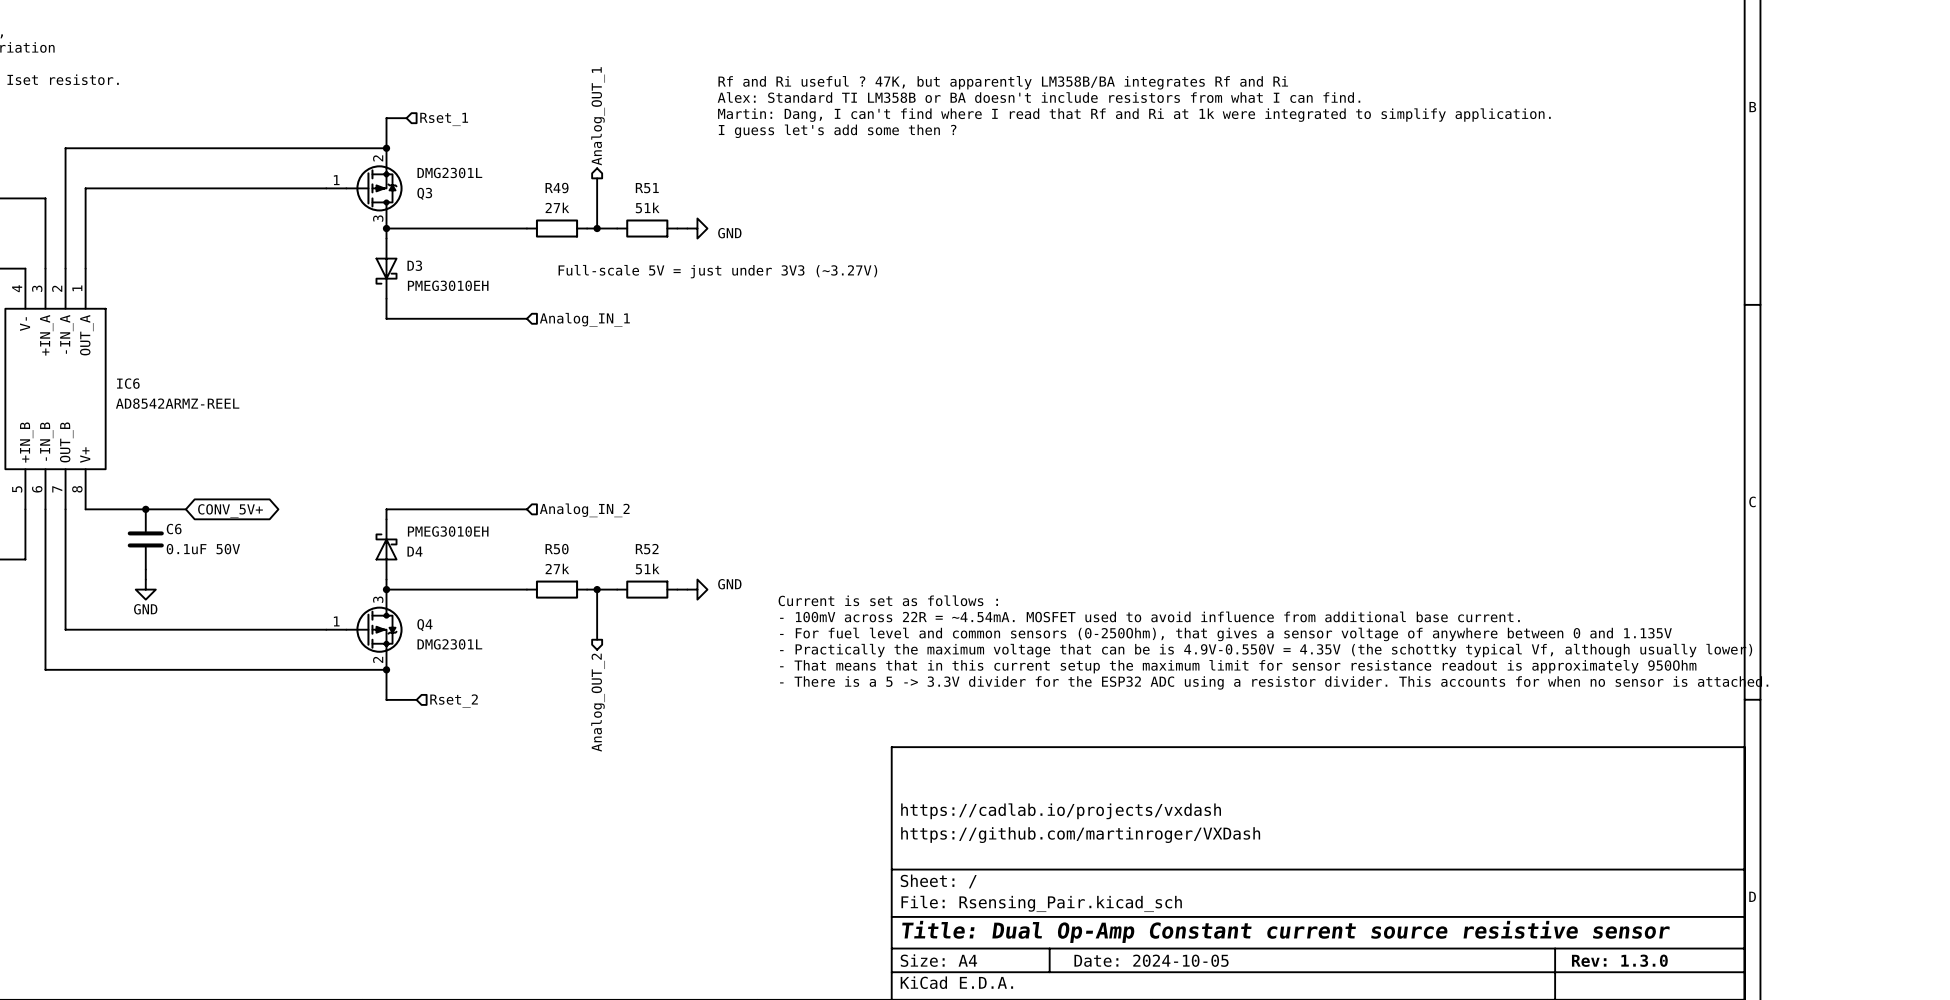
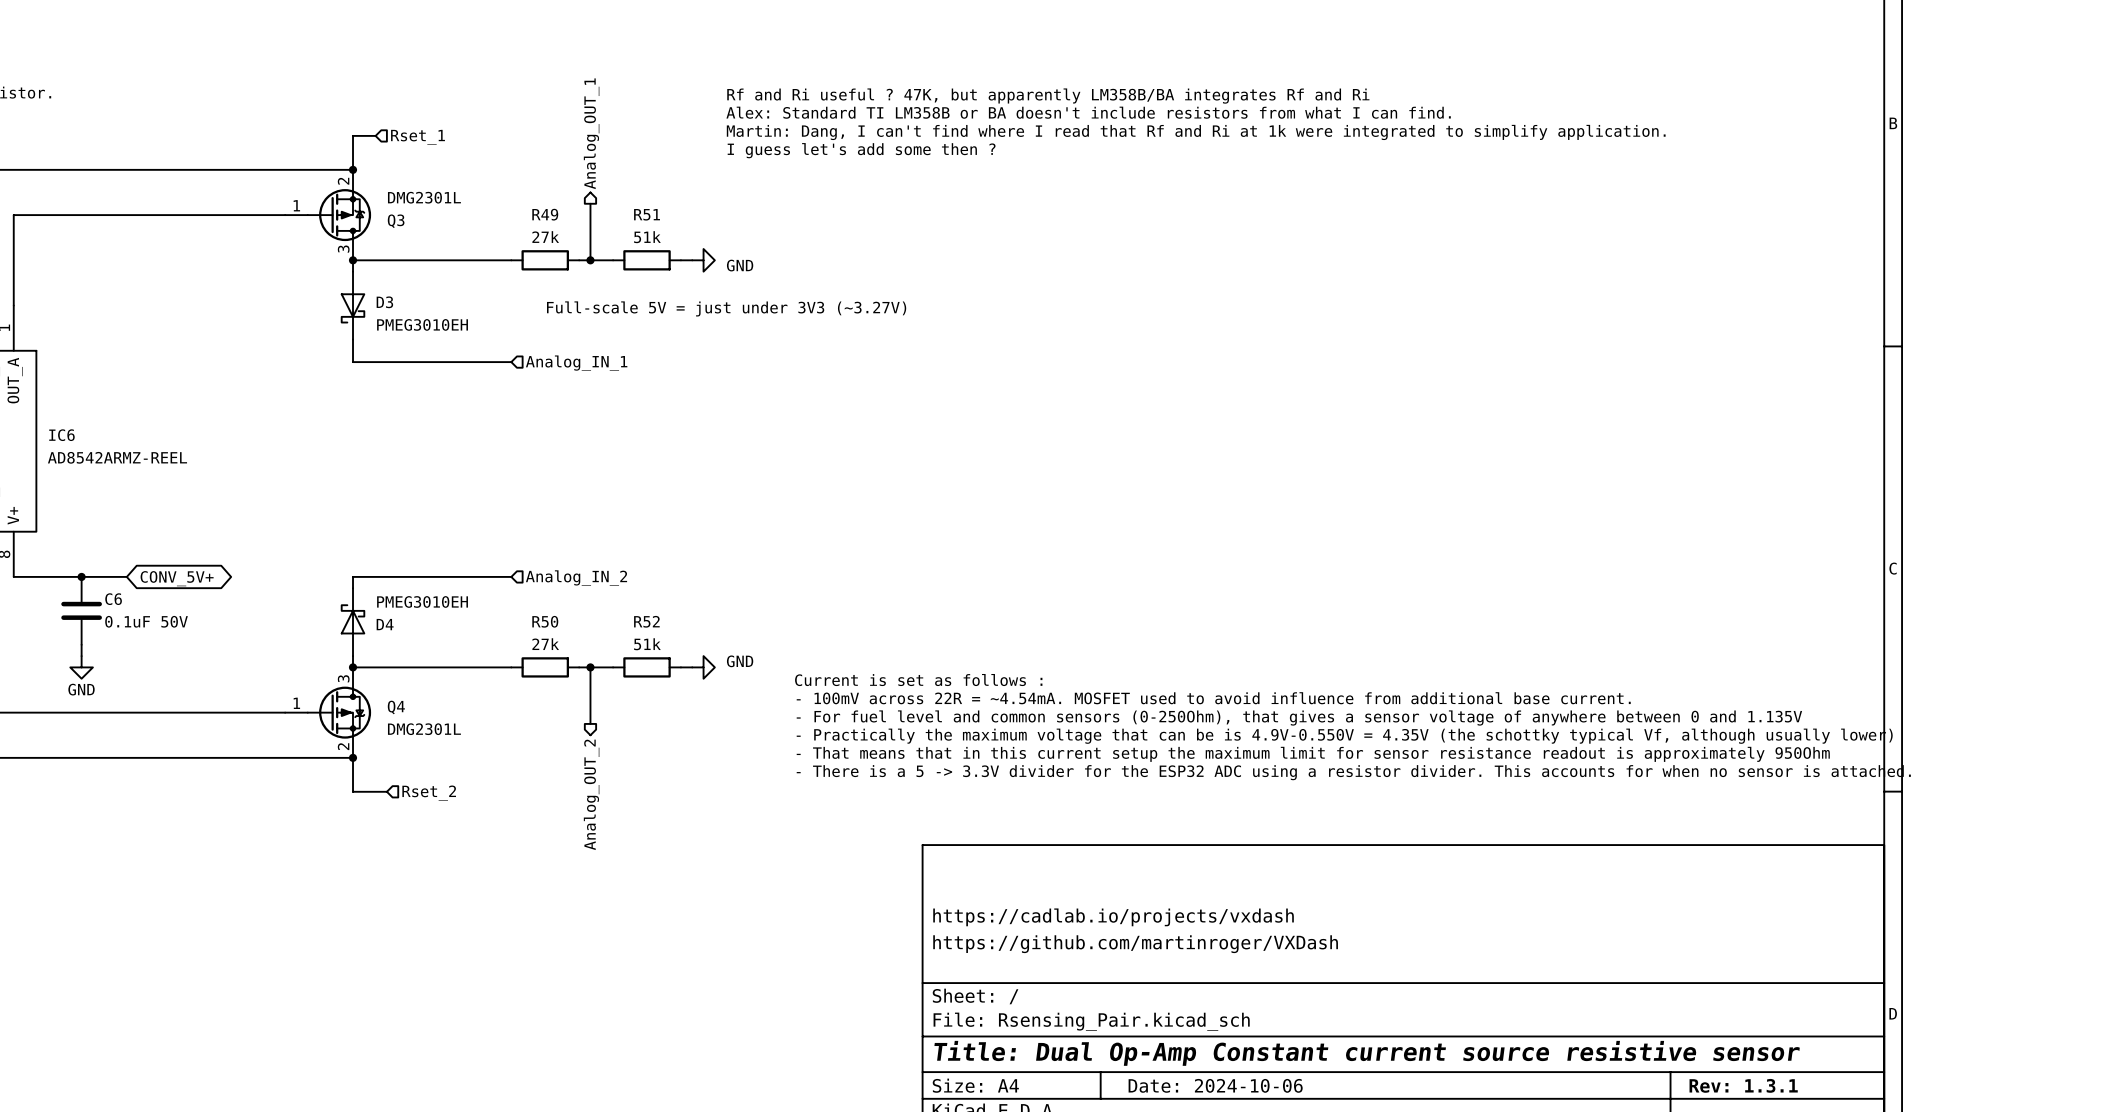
title block: Date: 2024-10-05 (1151, 960) -> Date: 2024-10-06 (1215, 1085)
title block: Rev: 1.3.0 (1619, 960) -> Rev: 1.3.1 (1743, 1085)

